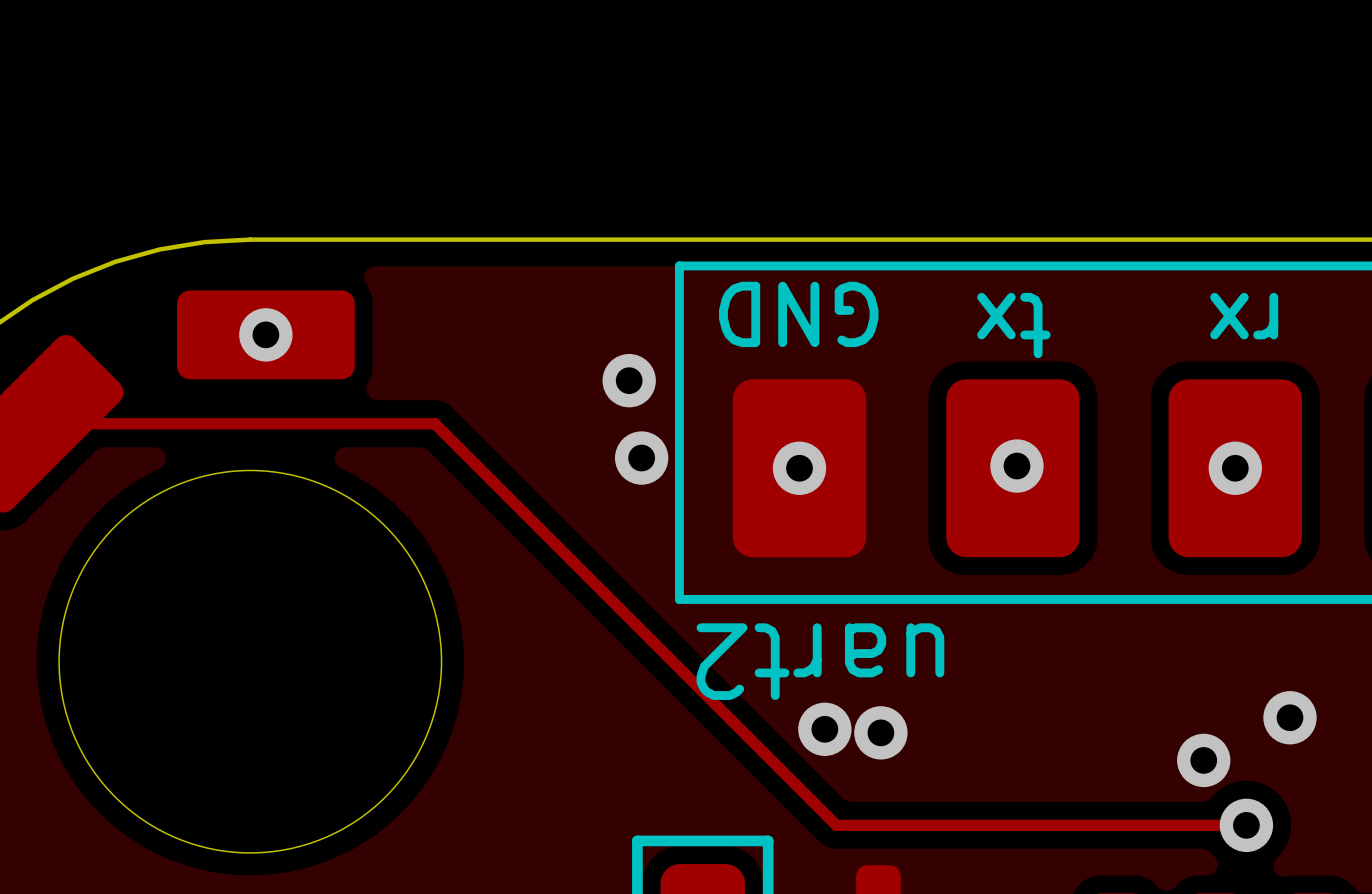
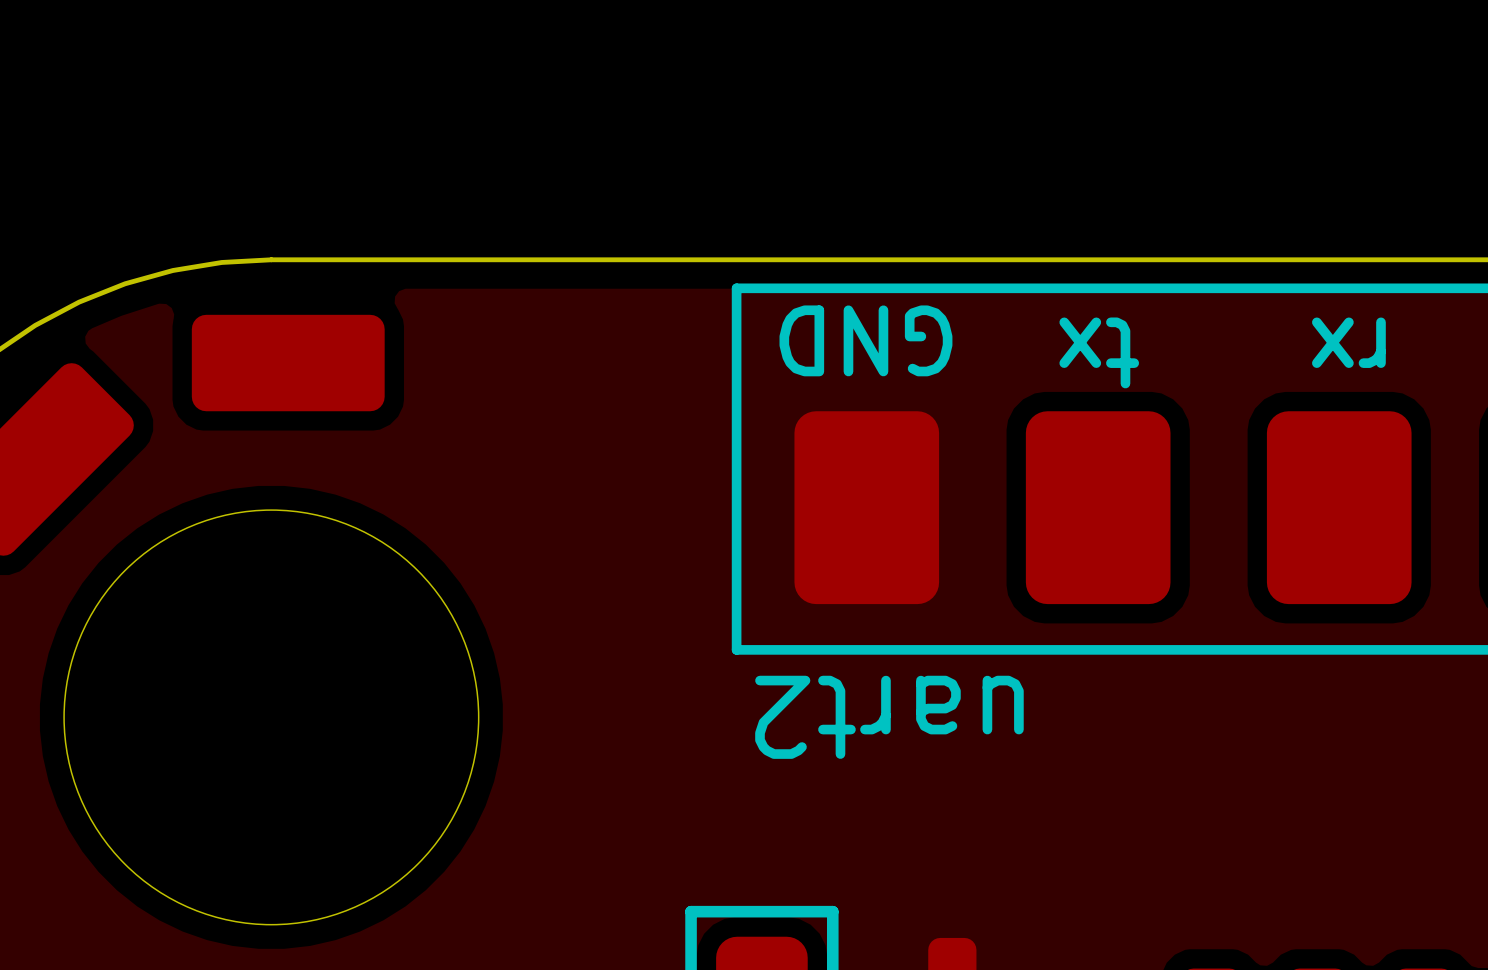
via: (265, 334) -> none
via: (629, 380) -> none
track: (34, 423) (434, 423) (836, 825) (1246, 825) -> none
via: (641, 458) -> none
via: (1016, 466) -> none
via: (799, 468) -> none
via: (1235, 468) -> none
via: (1290, 717) -> none
via: (824, 729) -> none
via: (880, 732) -> none
via: (1203, 760) -> none
via: (1246, 825) -> none

